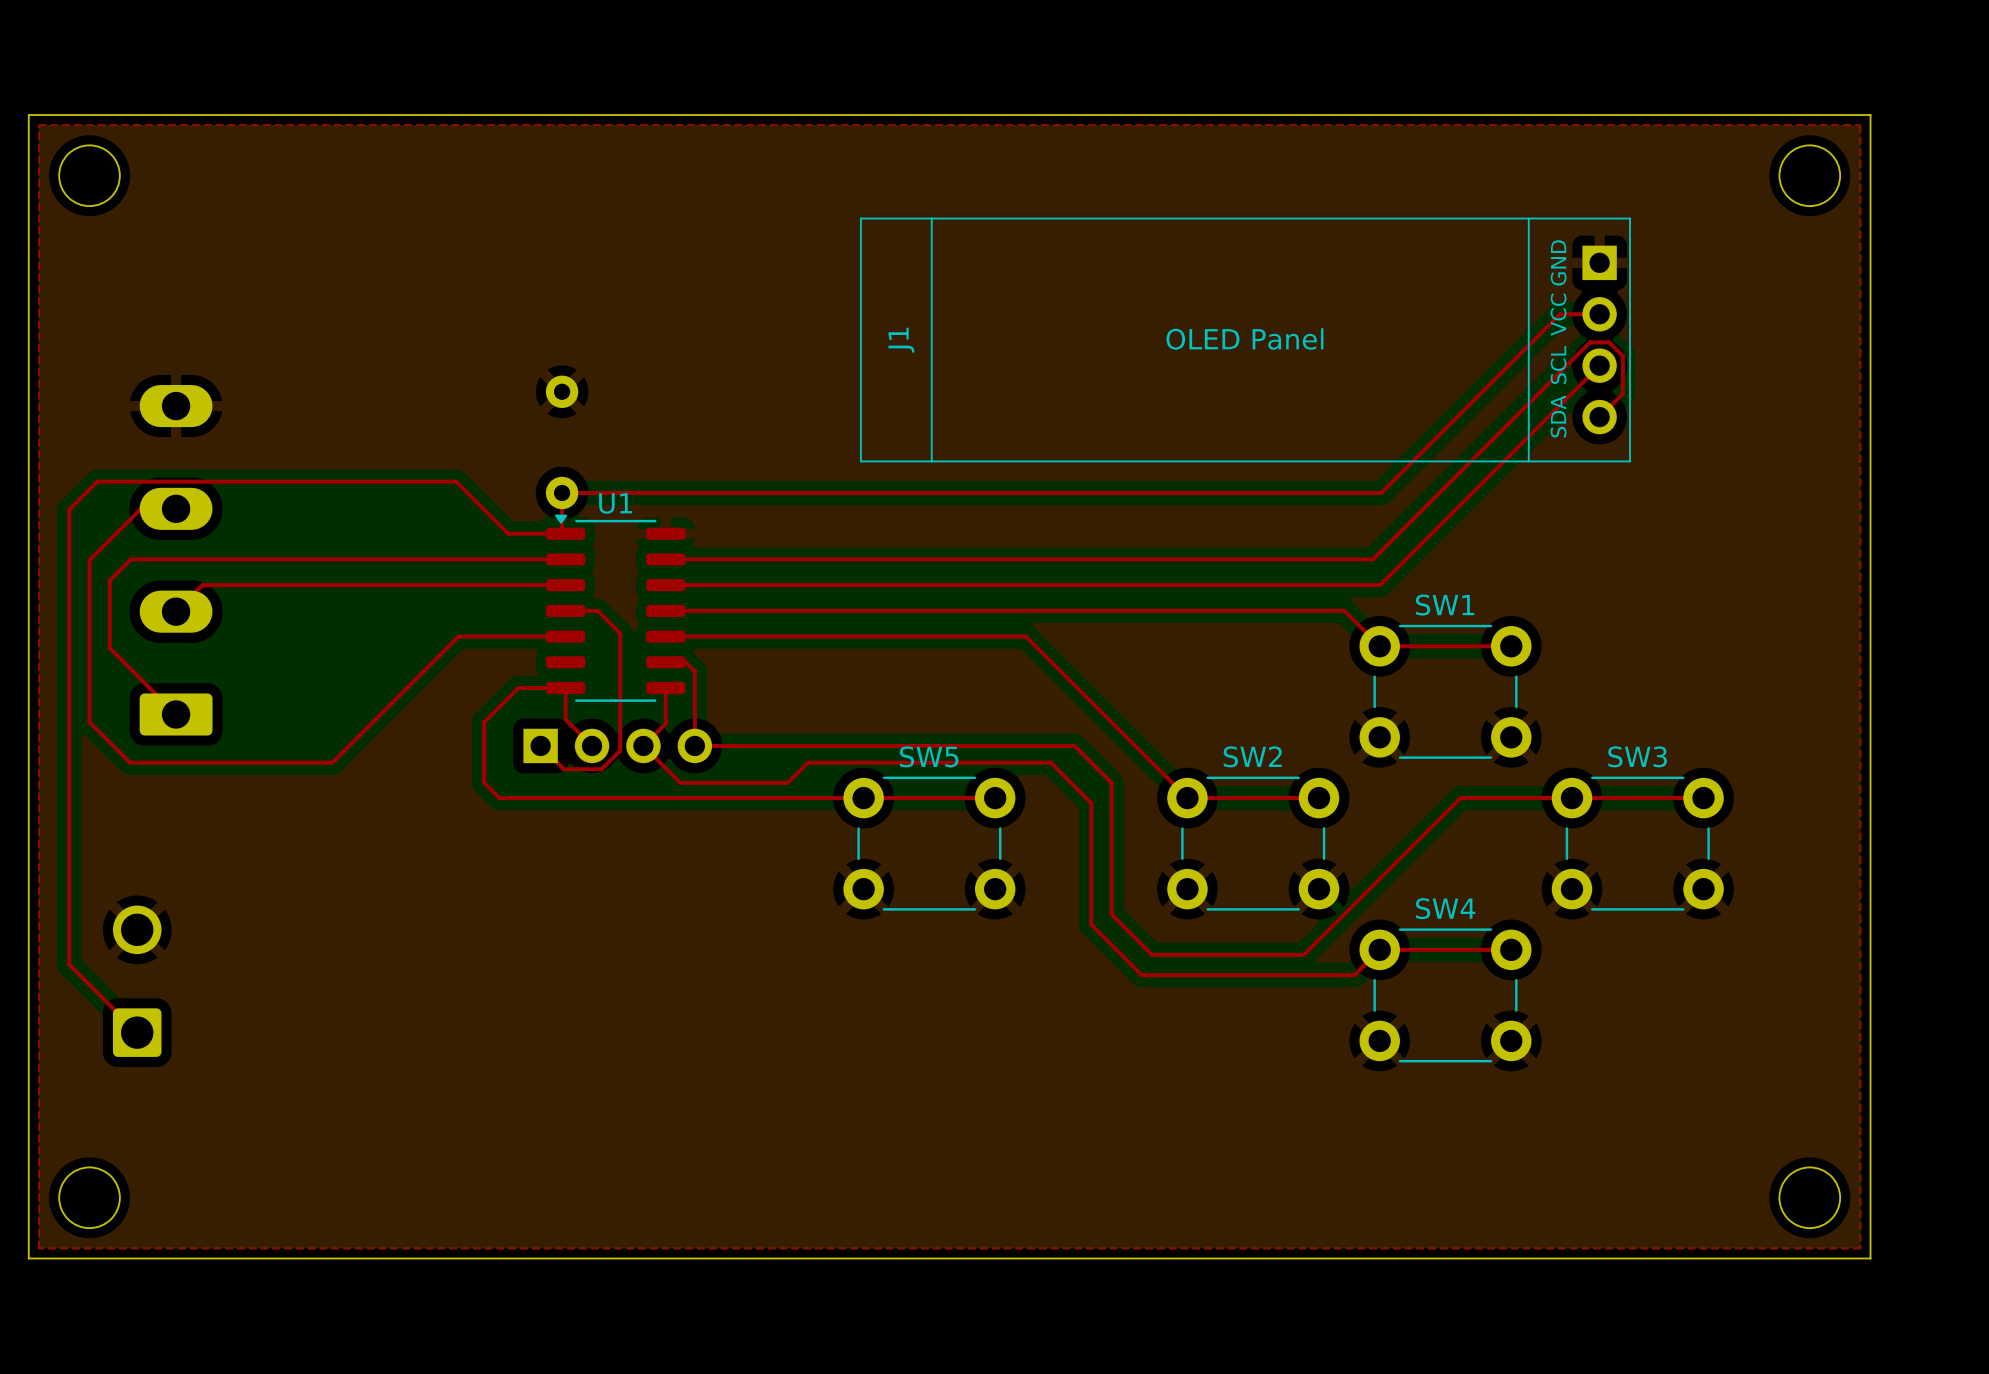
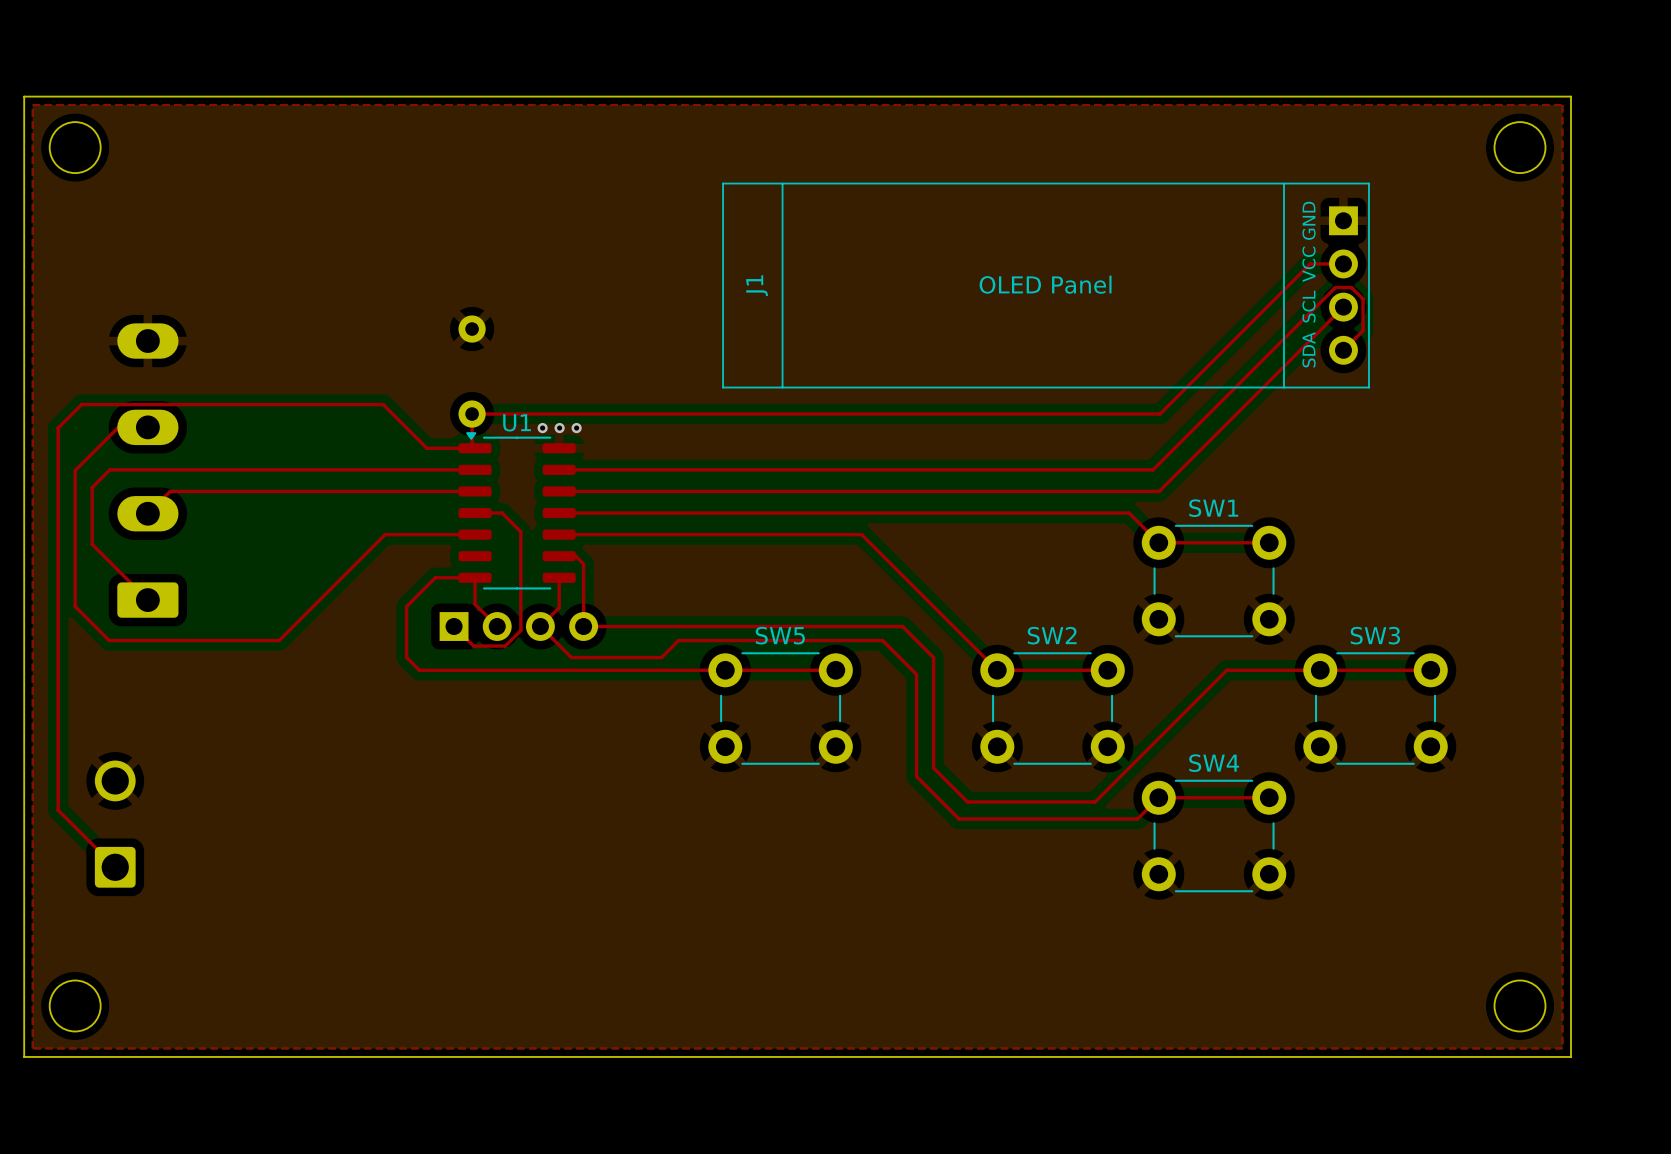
via: none -> (542, 428)
via: none -> (559, 428)
via: none -> (576, 428)

